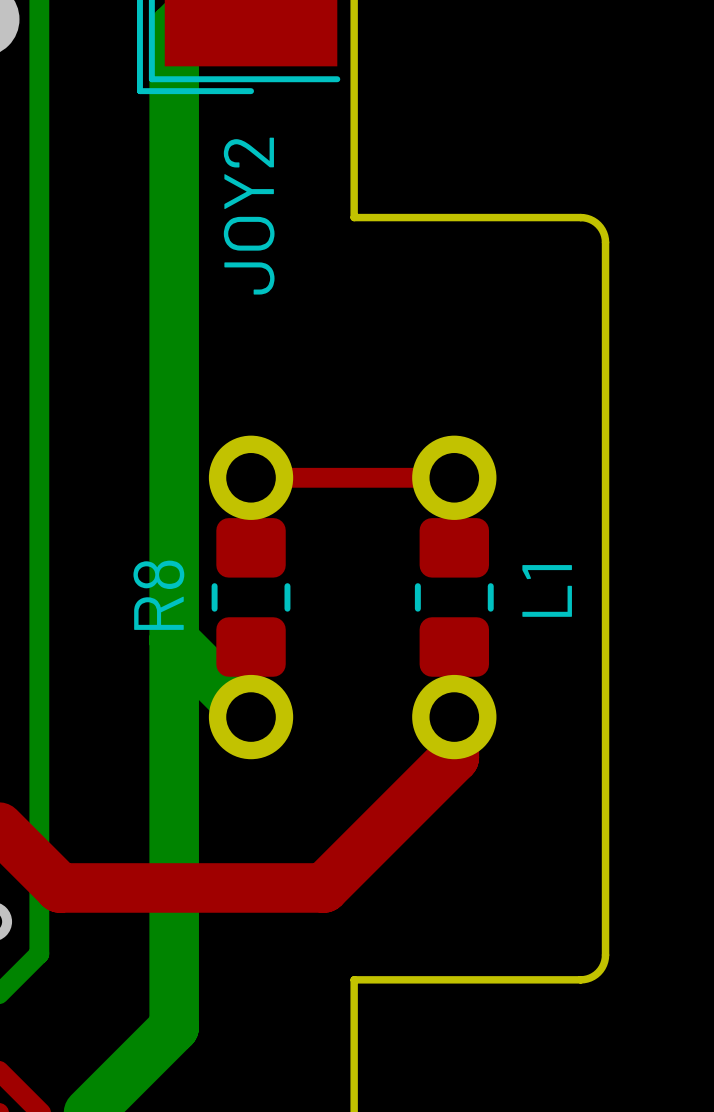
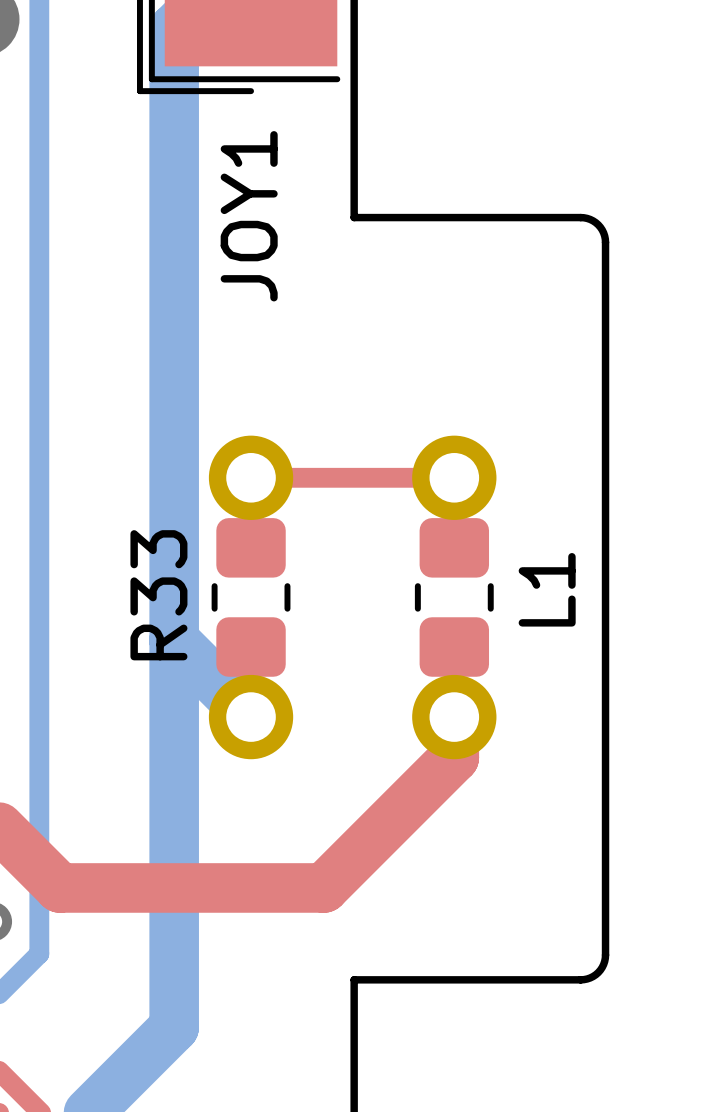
JOY2 name: JOY2 (249, 216) -> JOY1 (249, 216)
R8 name: R8 (158, 595) -> R33 (158, 595)

